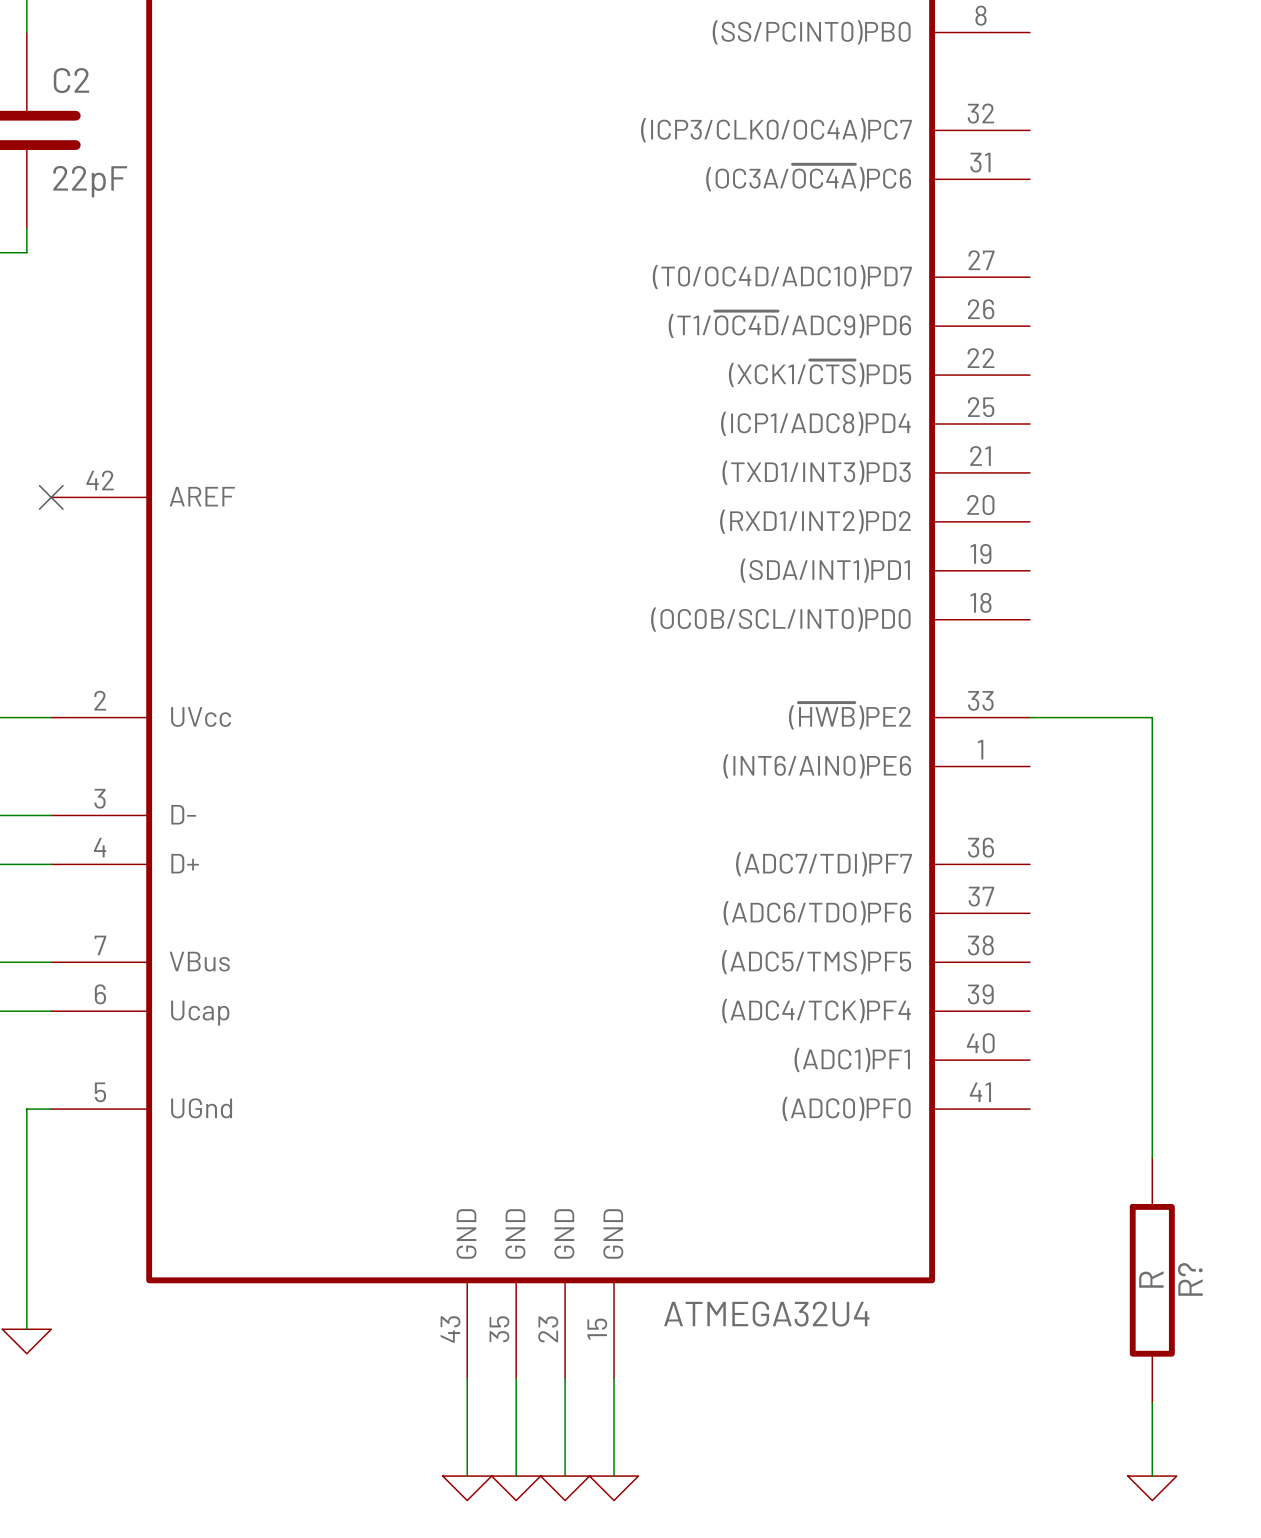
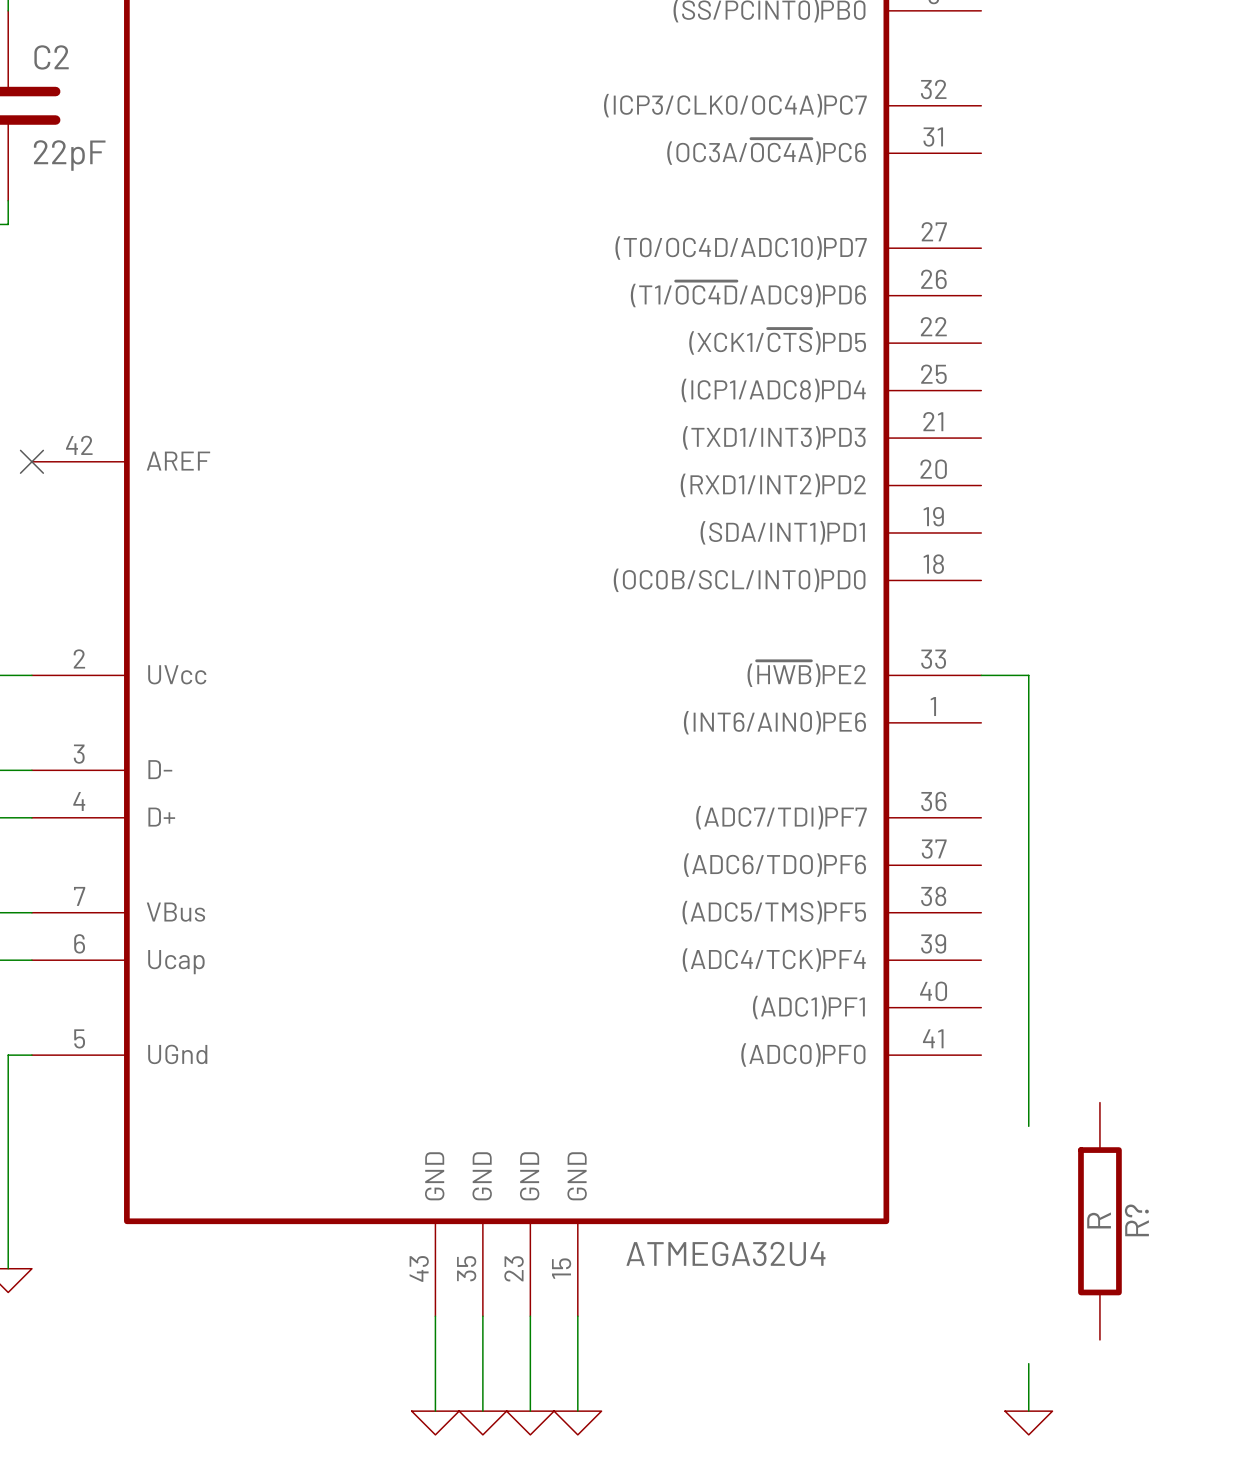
wire: (1078, 717) (1152, 717) (1152, 1158) -> (1028, 675) (1028, 1126)
wire: (1152, 1402) (1152, 1476) -> none
wire: none -> (1028, 1363) (1028, 1411)
power symbol position: (1152, 1488) -> (1028, 1423)

